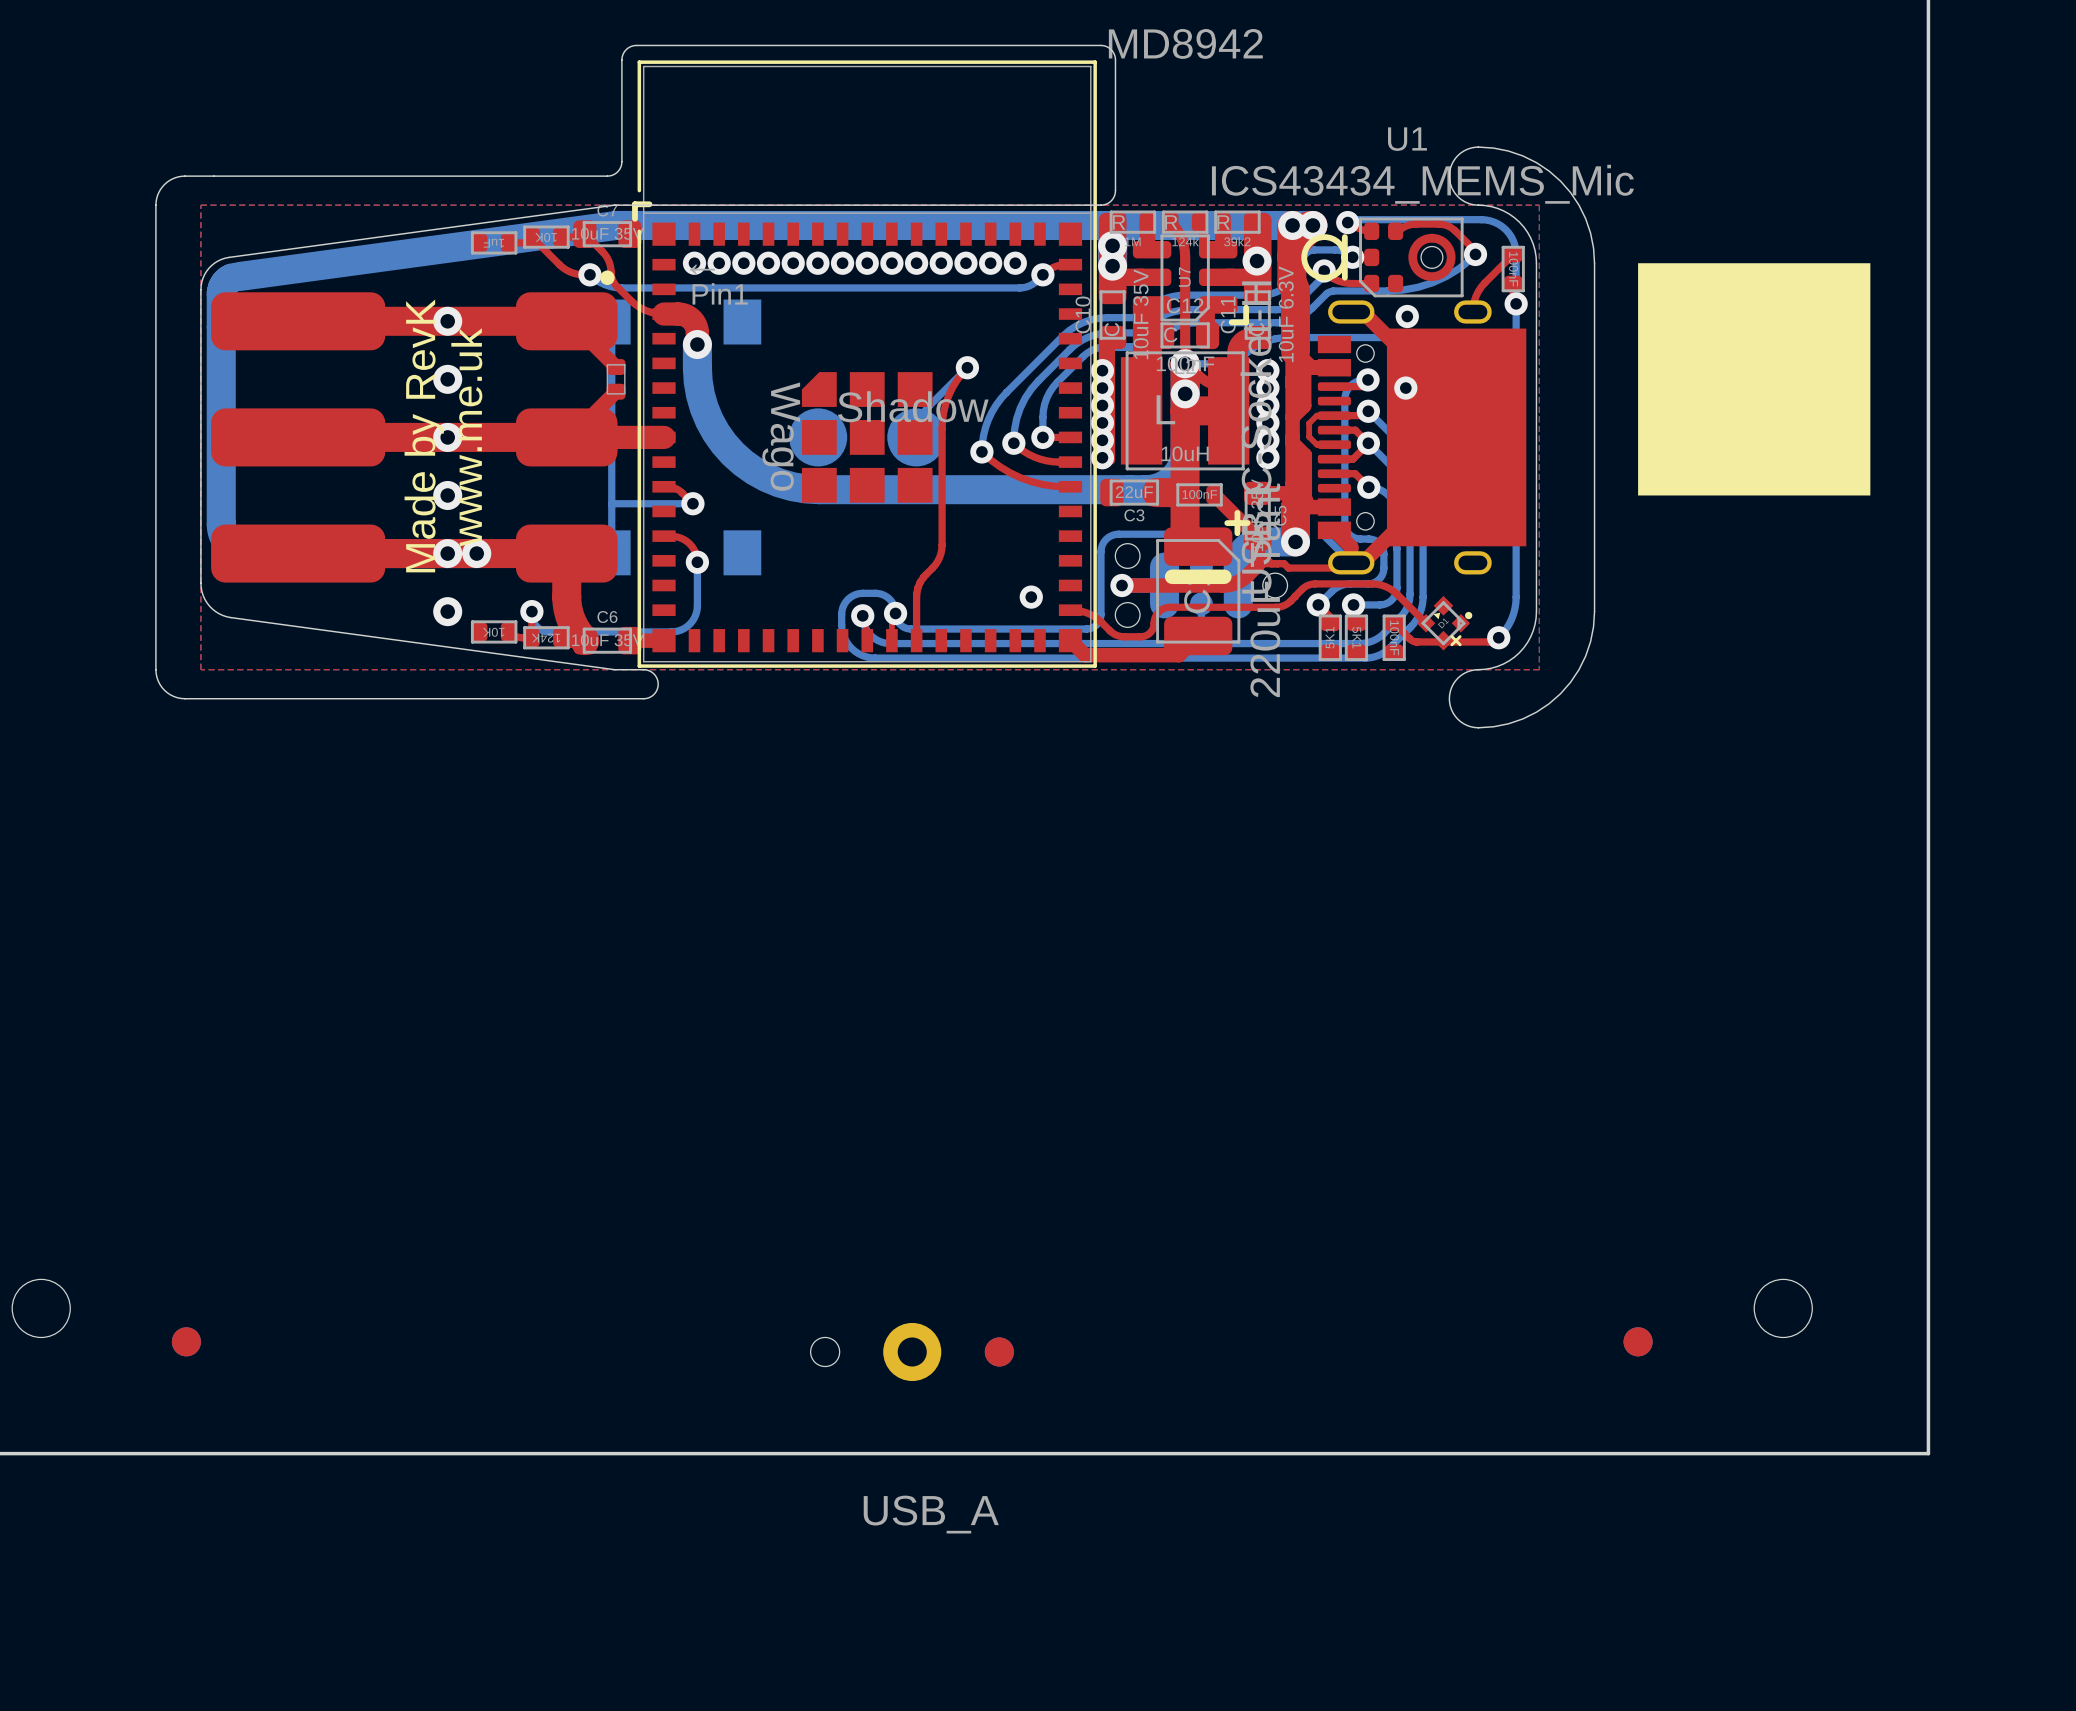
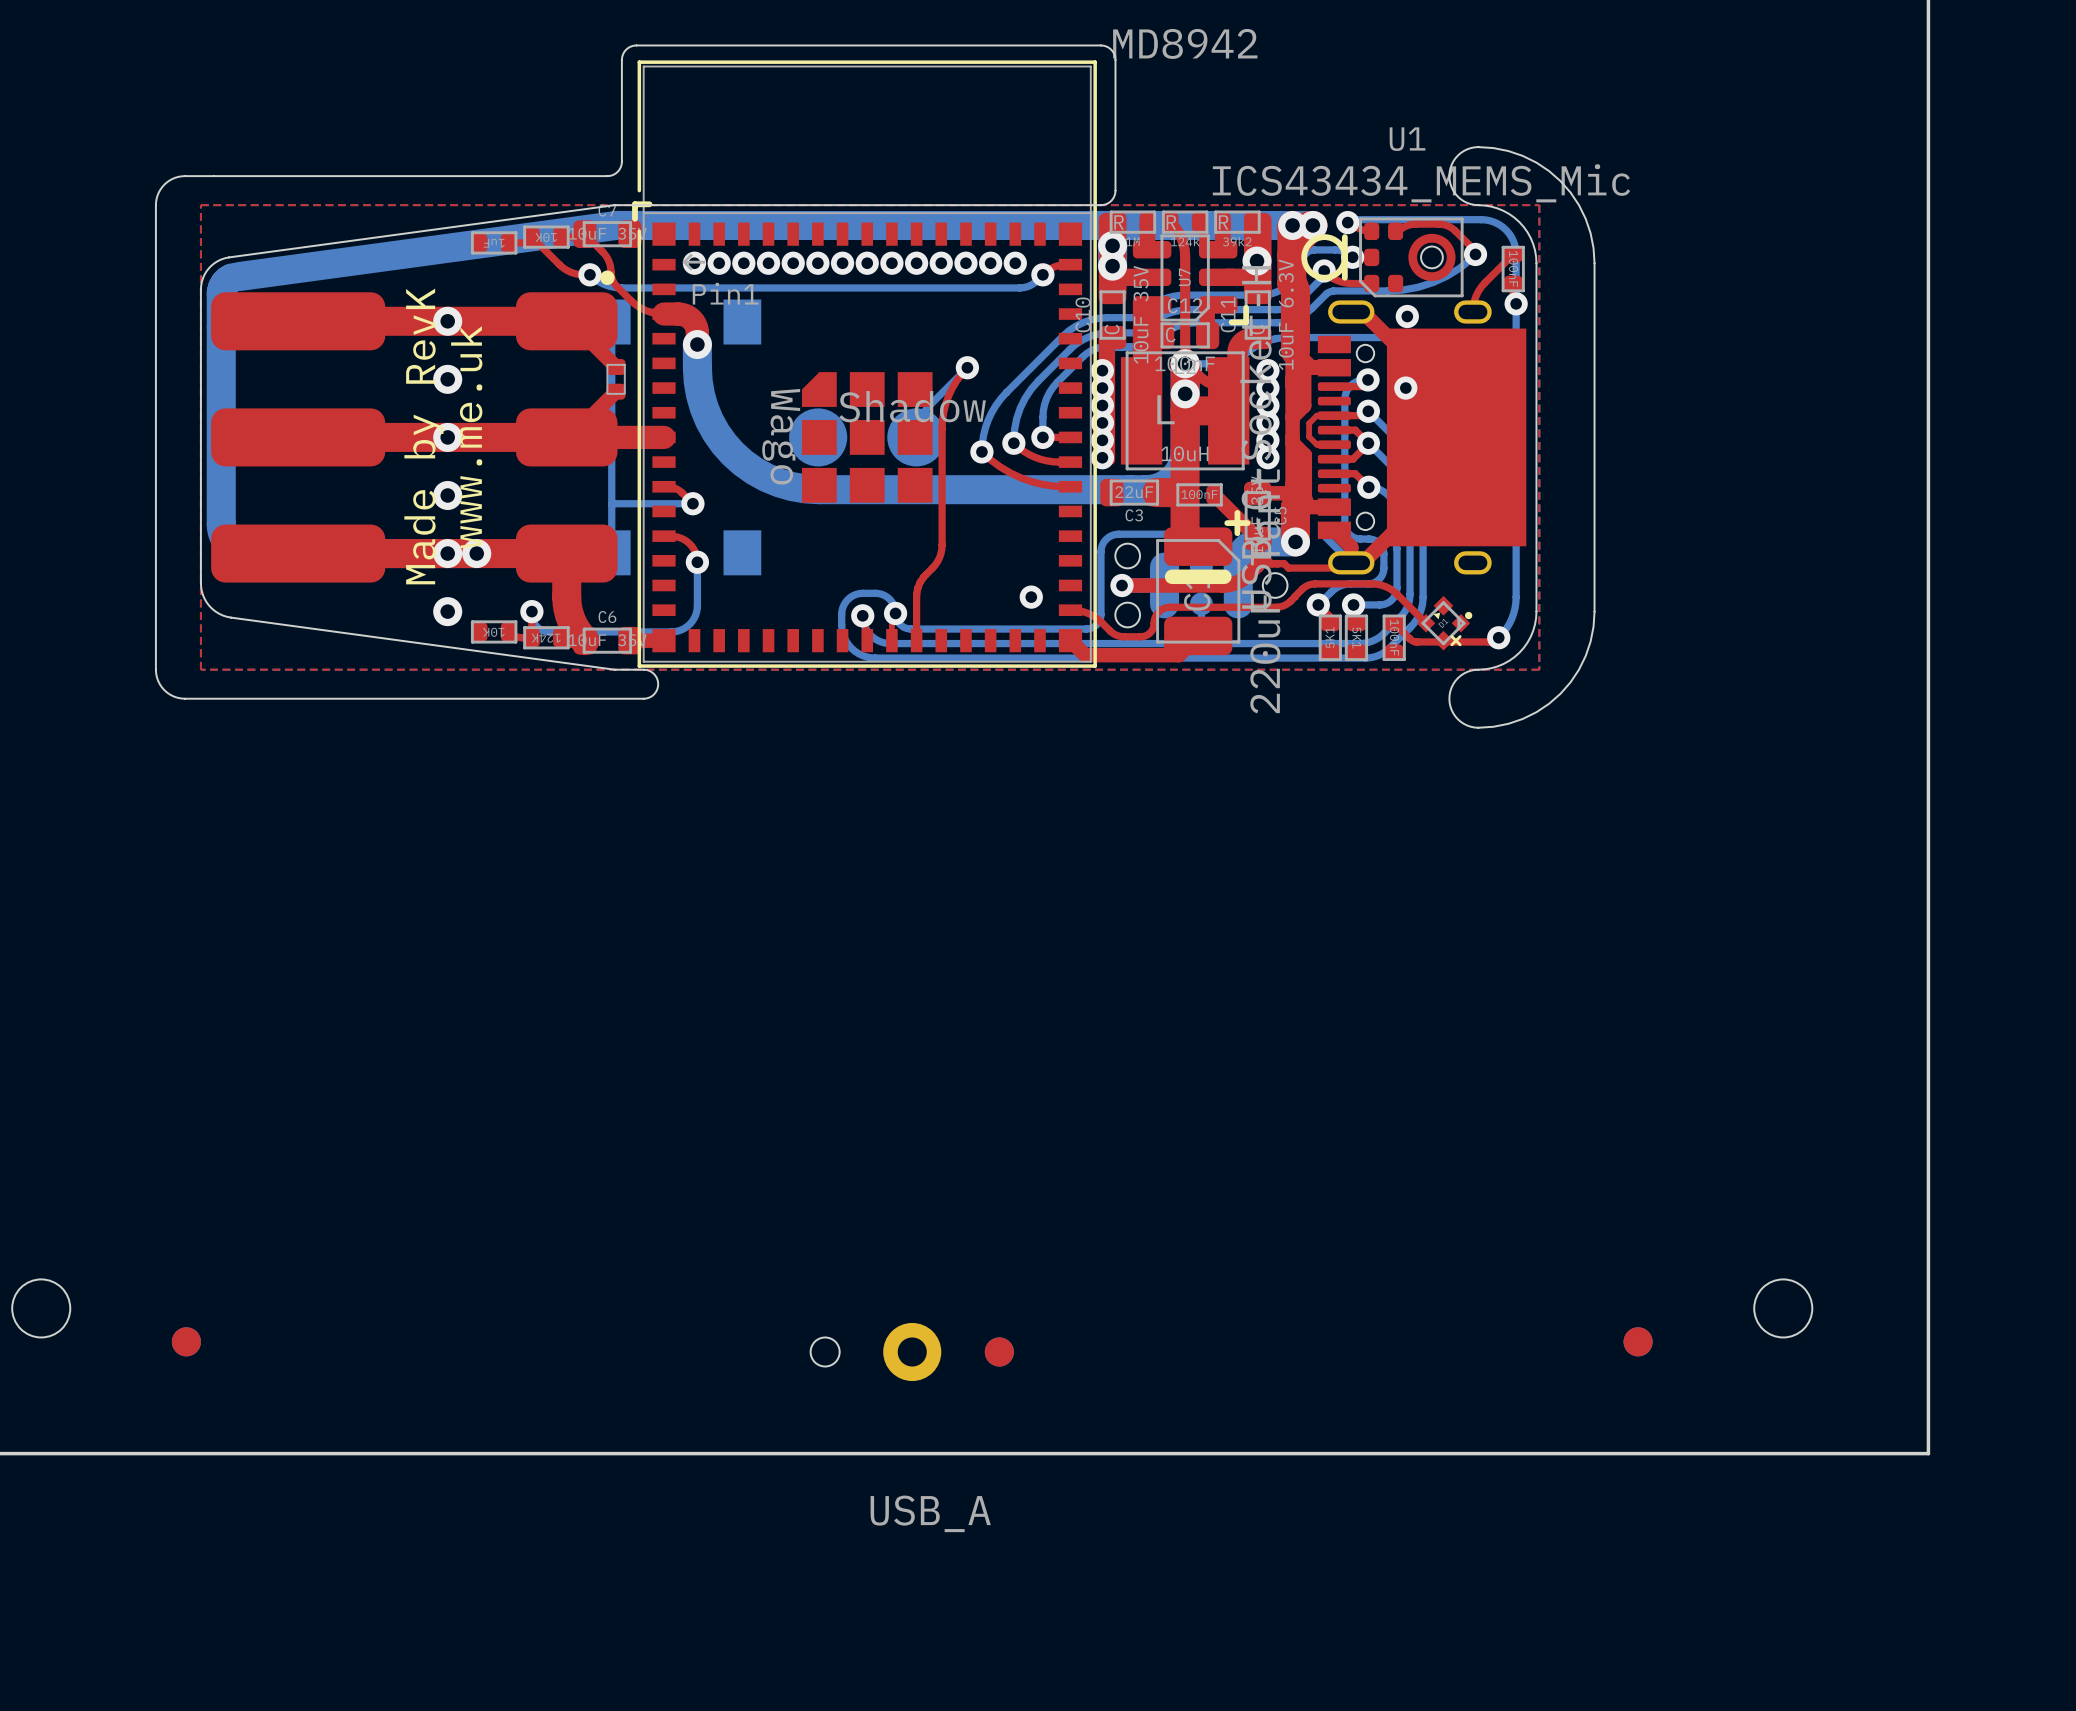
drawing: [1638, 263, 1871, 496] -> none

